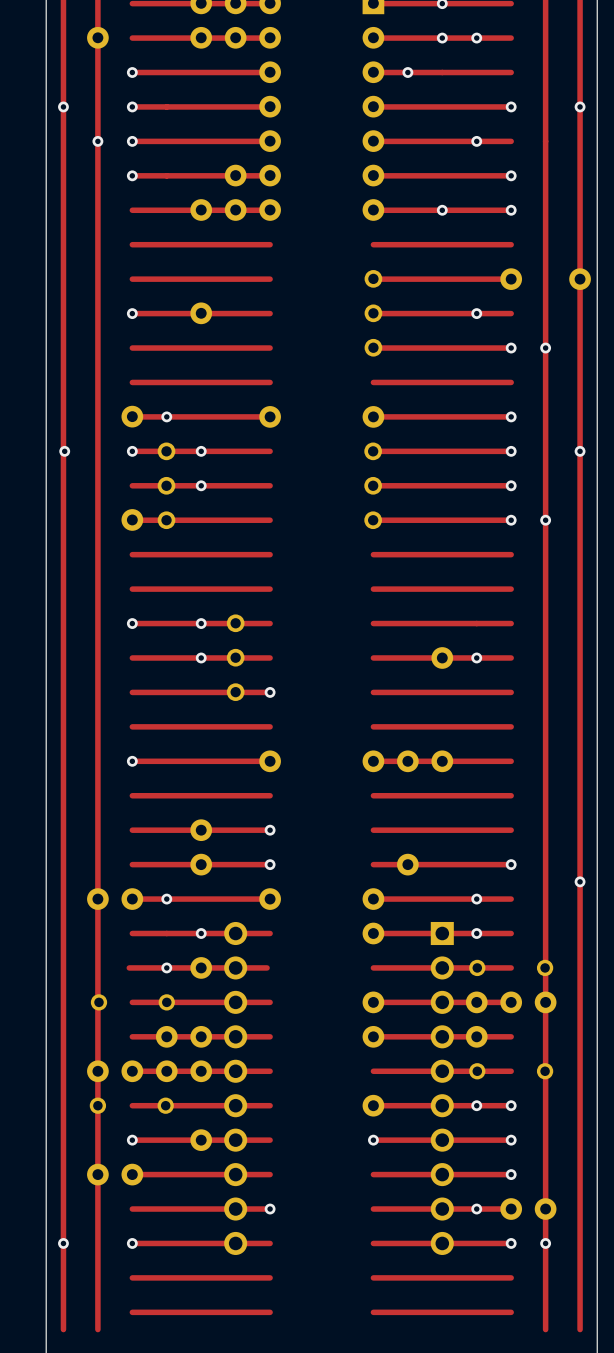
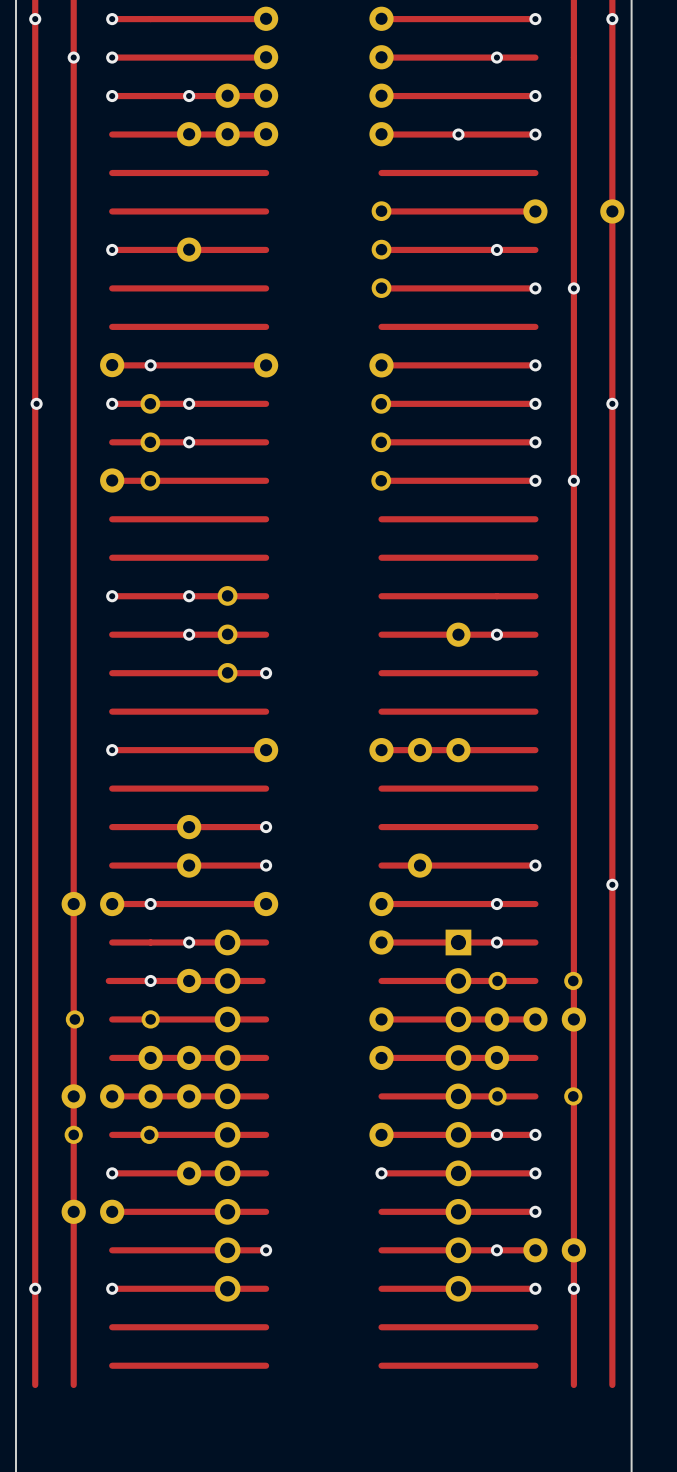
via: none -> (189, 96)

